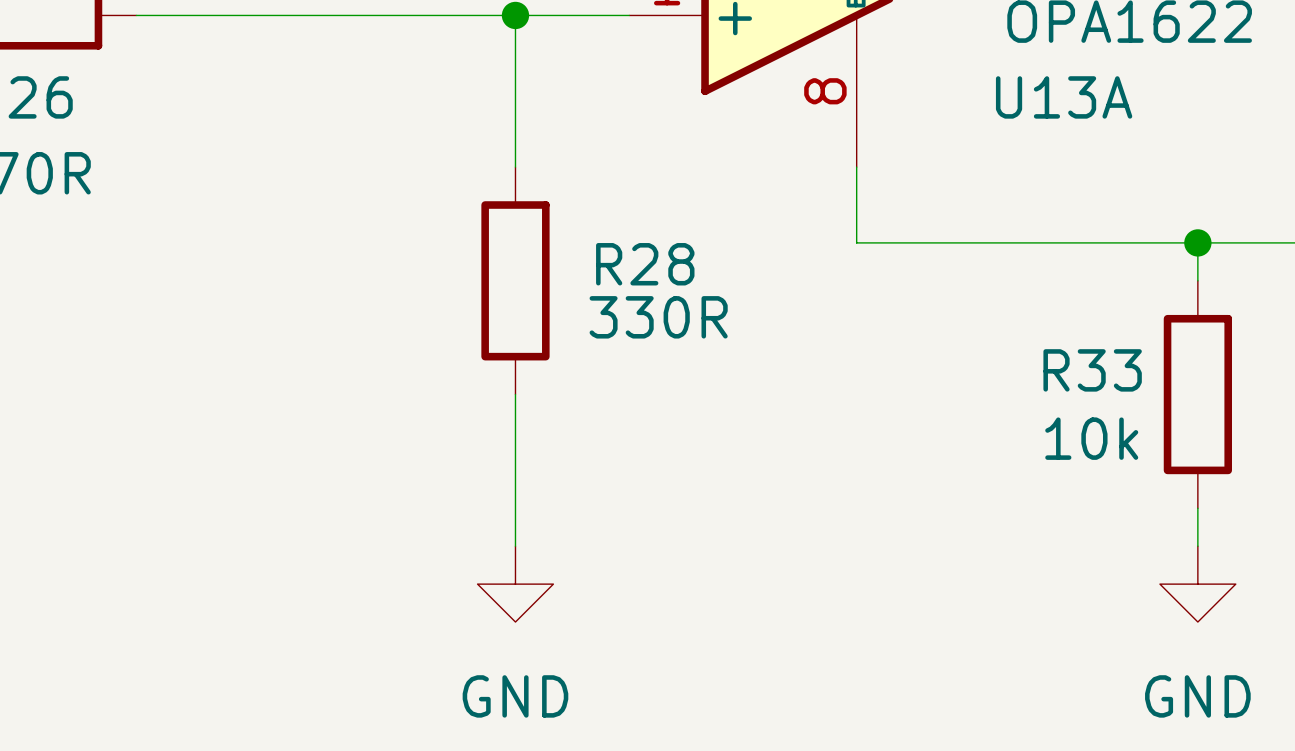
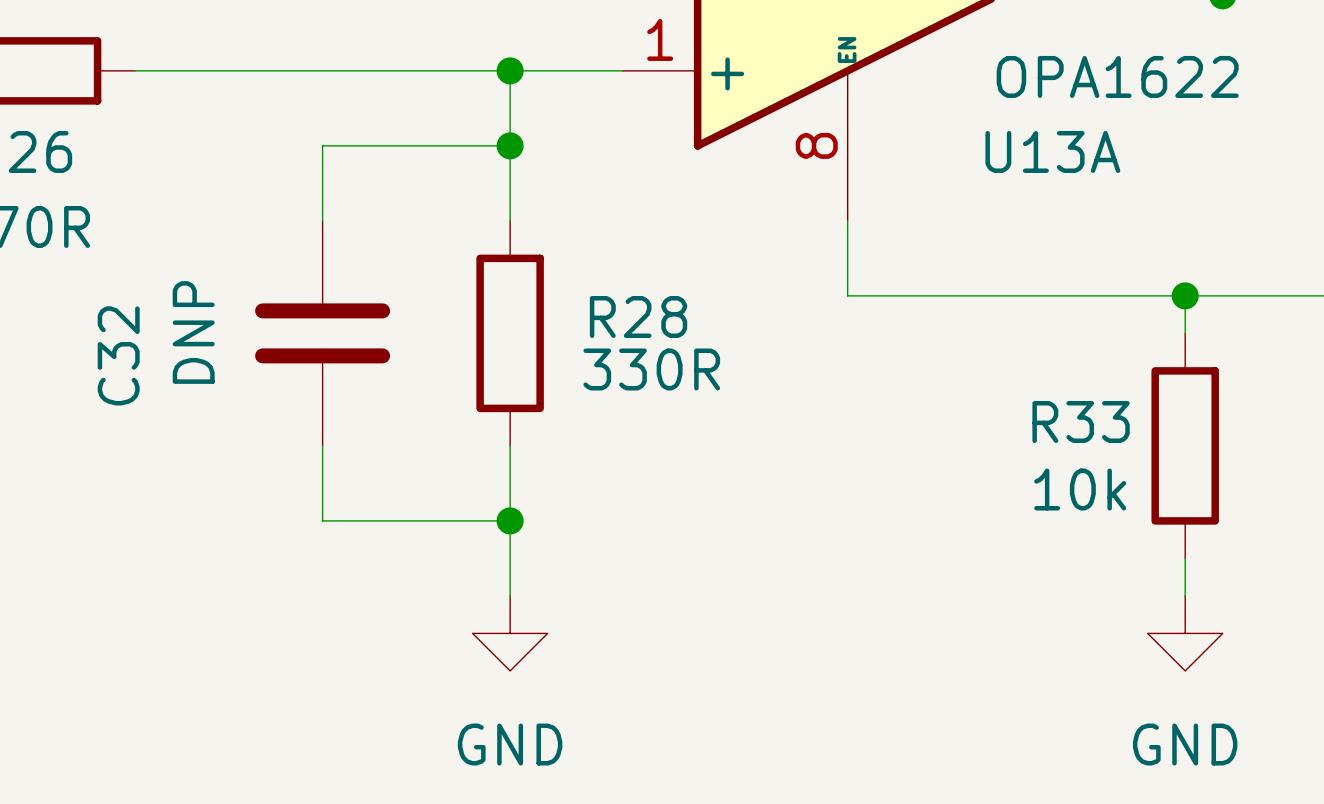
wire: none -> (510, 145) (322, 145) (322, 220)
junction: none -> (510, 145)
C32: none -> DNP (322, 333)
wire: none -> (322, 445) (322, 520) (510, 520)
junction: none -> (510, 520)

